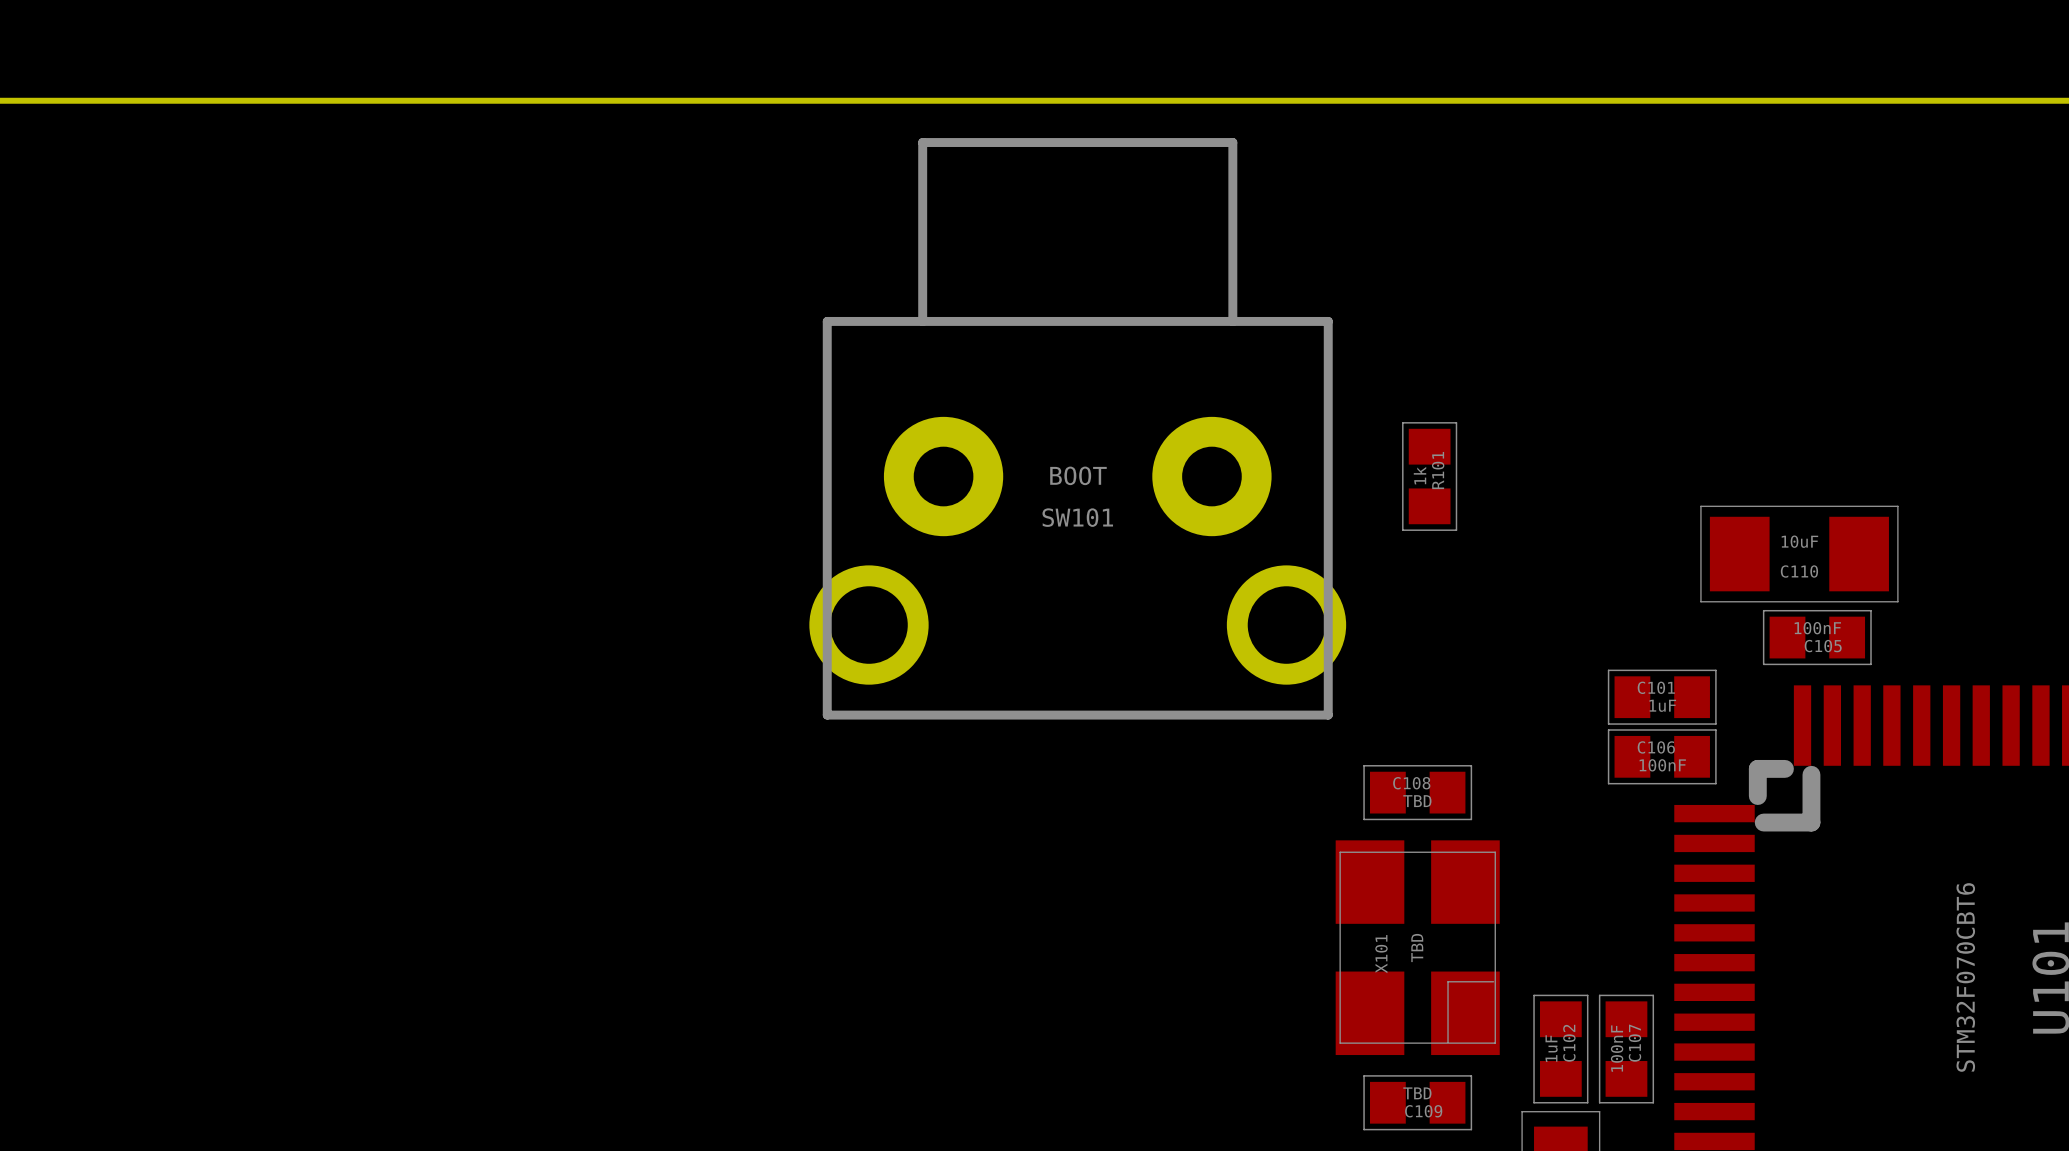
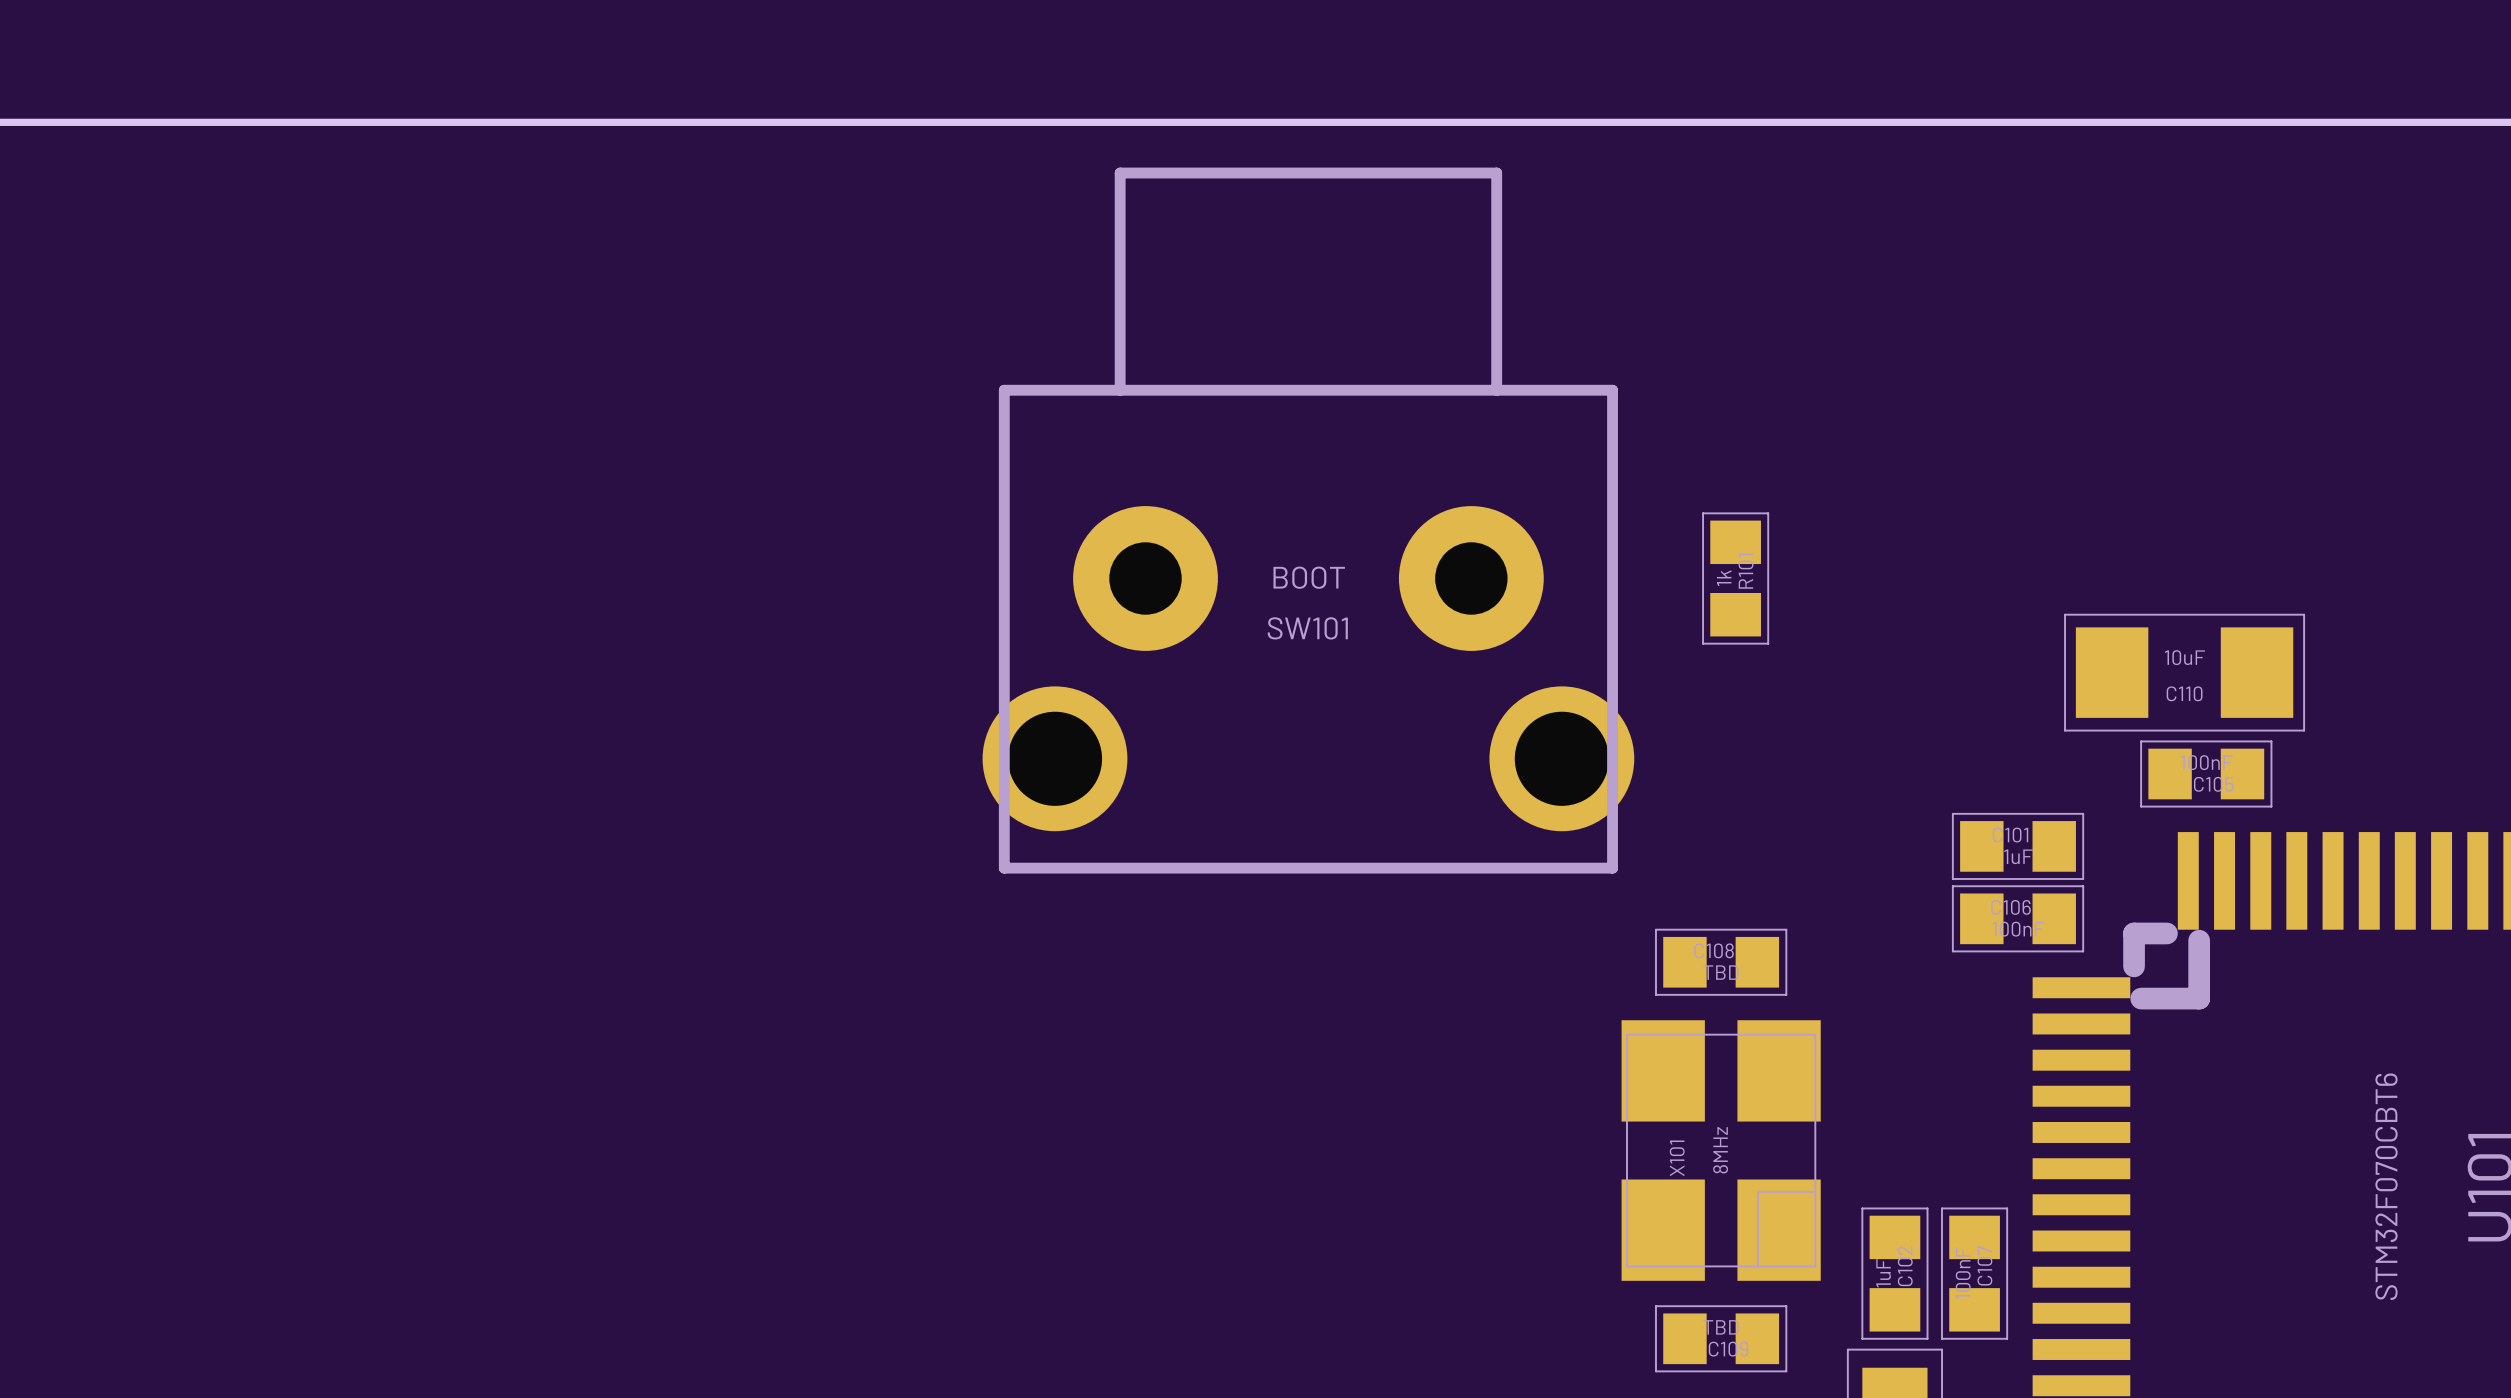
X101 value: TBD (1417, 948) -> 8MHz (1720, 1150)

